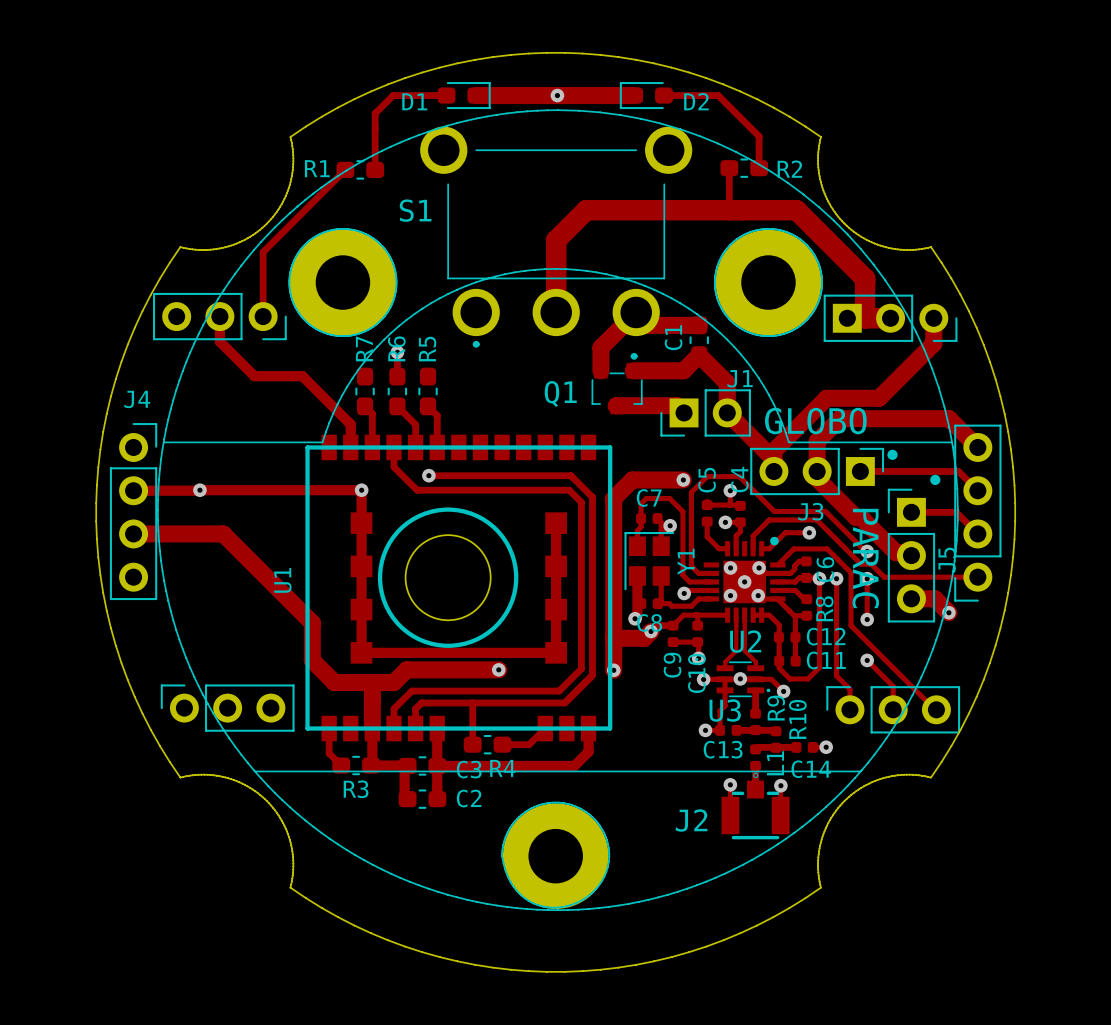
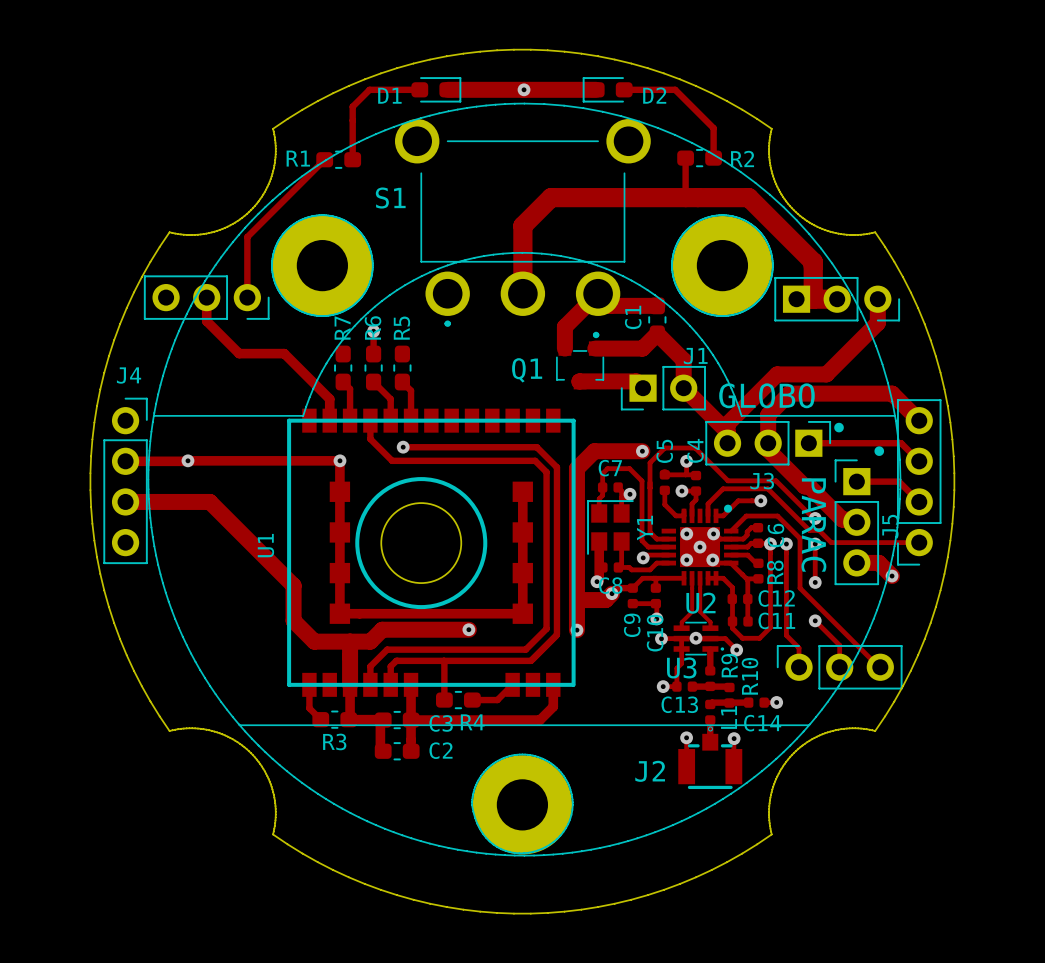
J4 footprint: [109, 292, 1002, 734] -> [103, 275, 942, 690]

